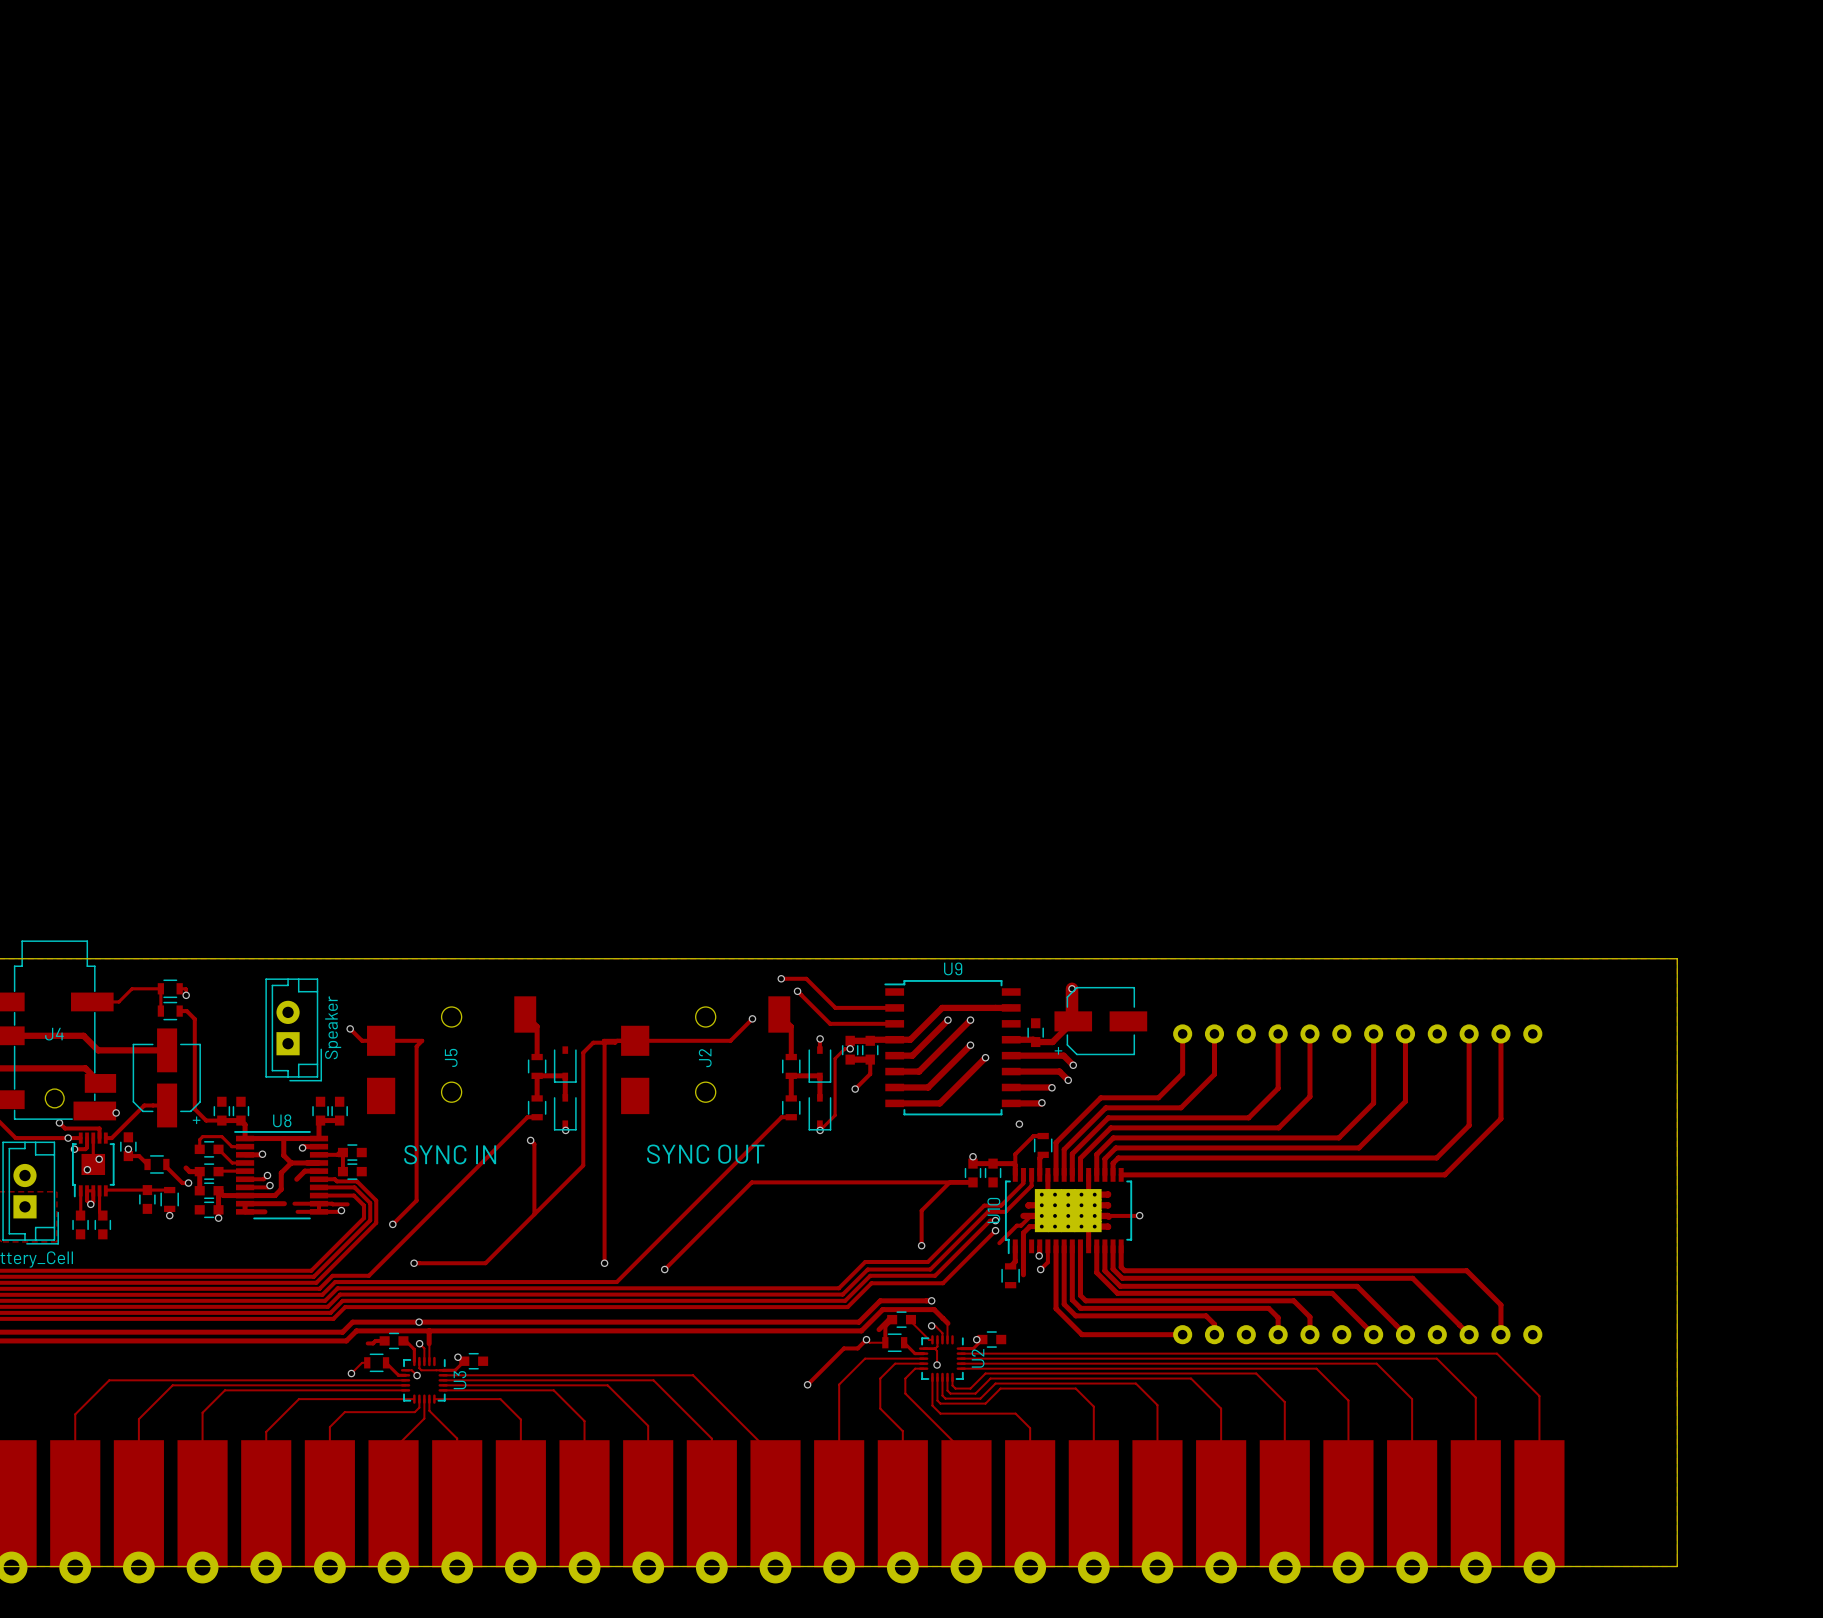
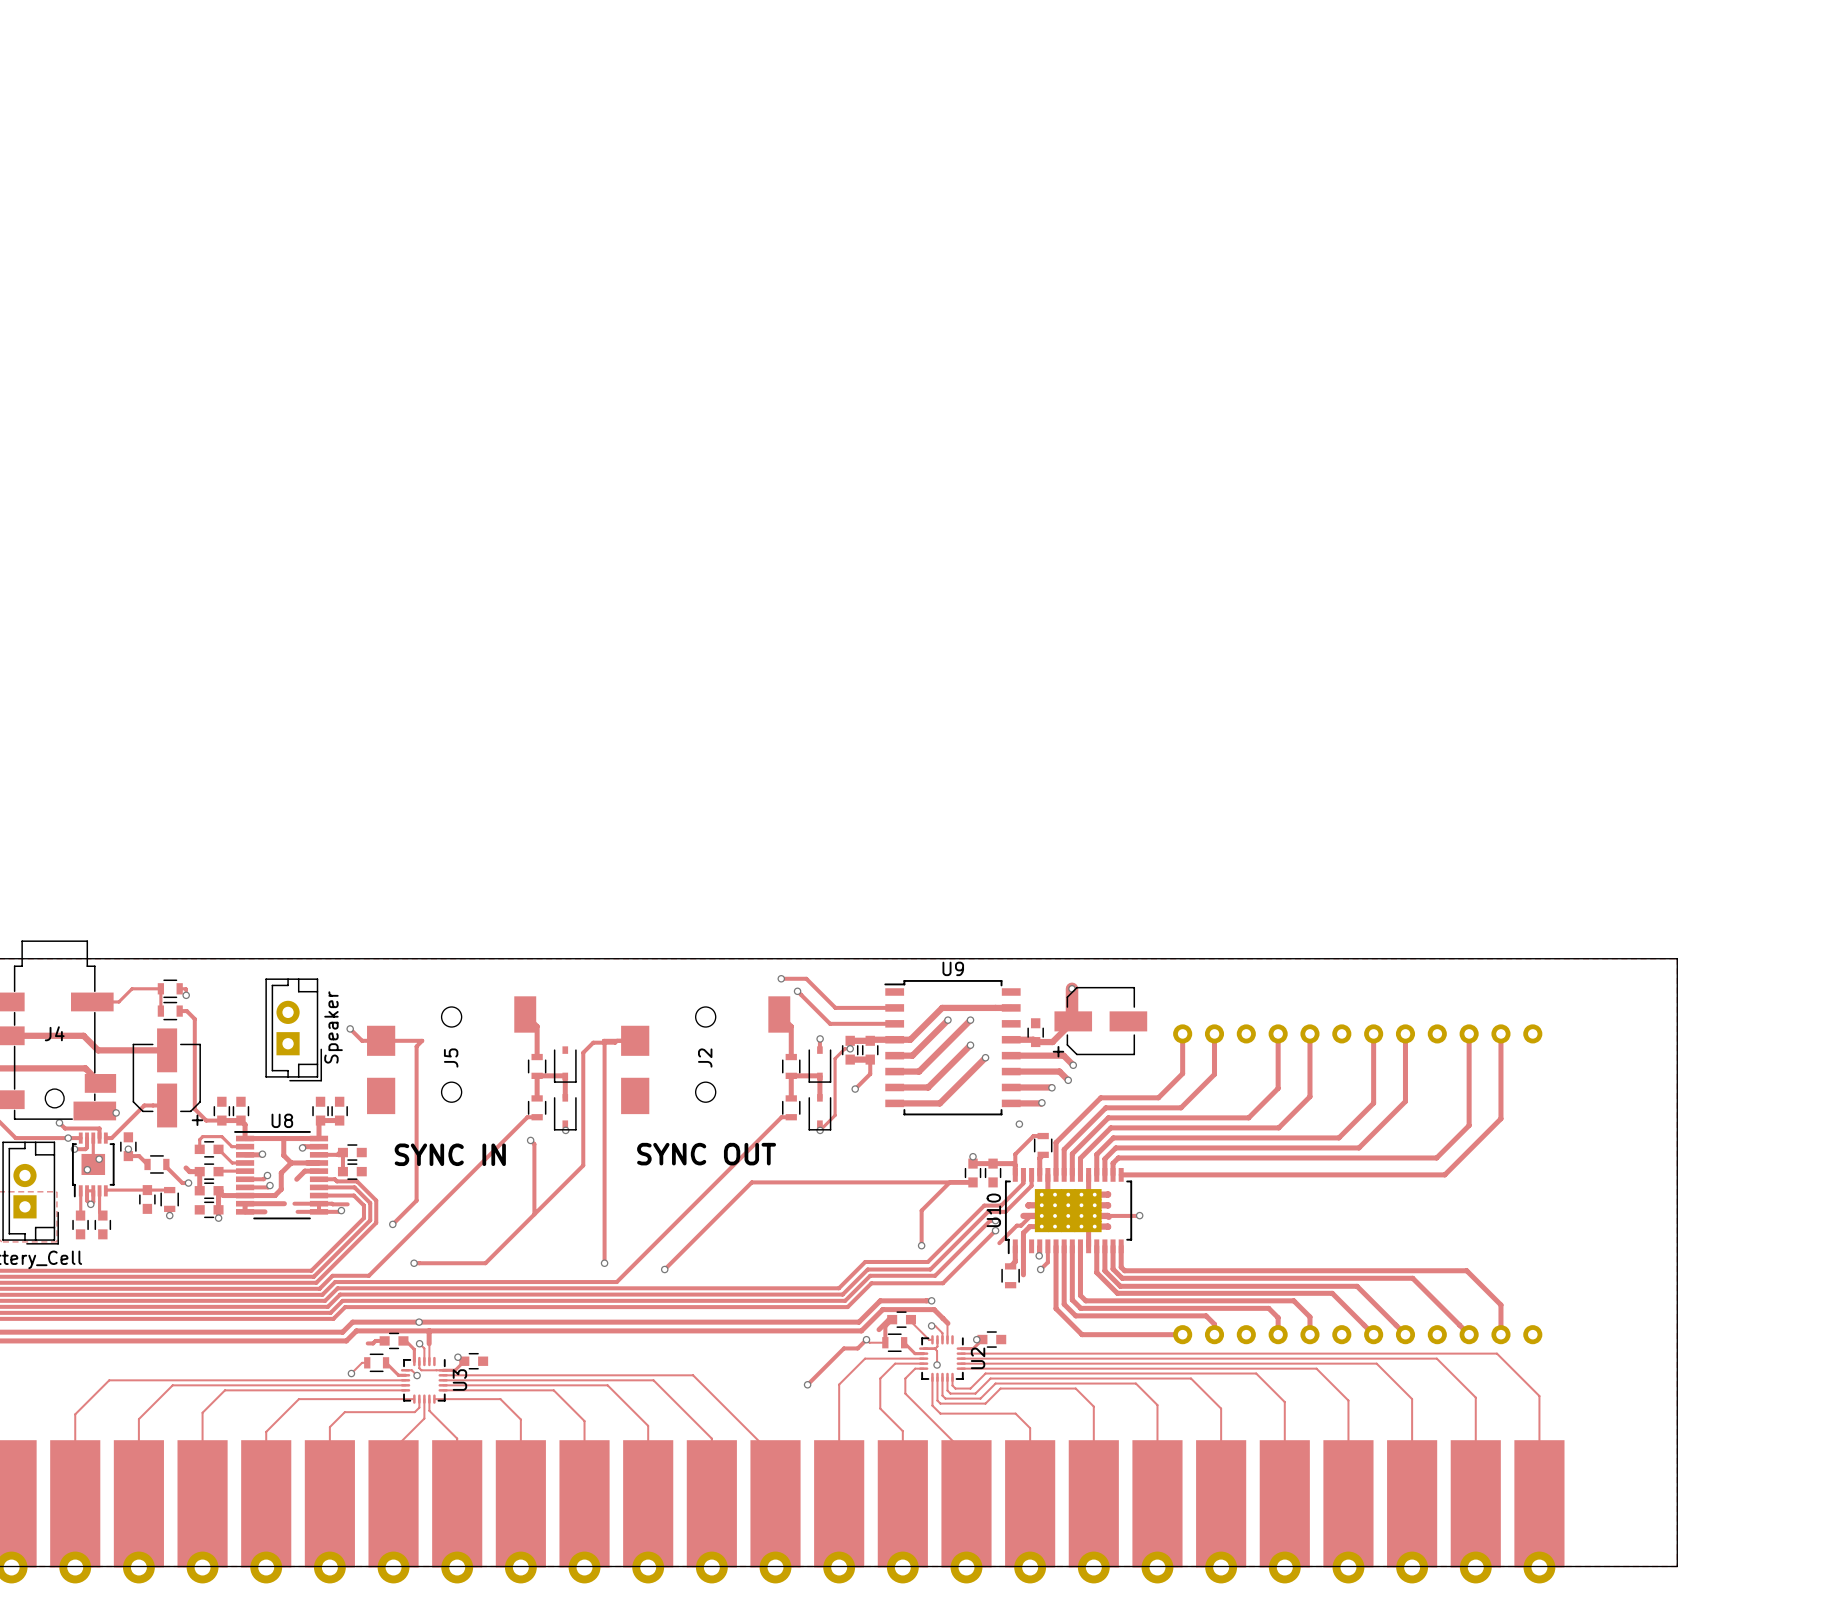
track: (752, 1018) (730, 1040) (635, 1040) -> none
via: (752, 1018) -> none

